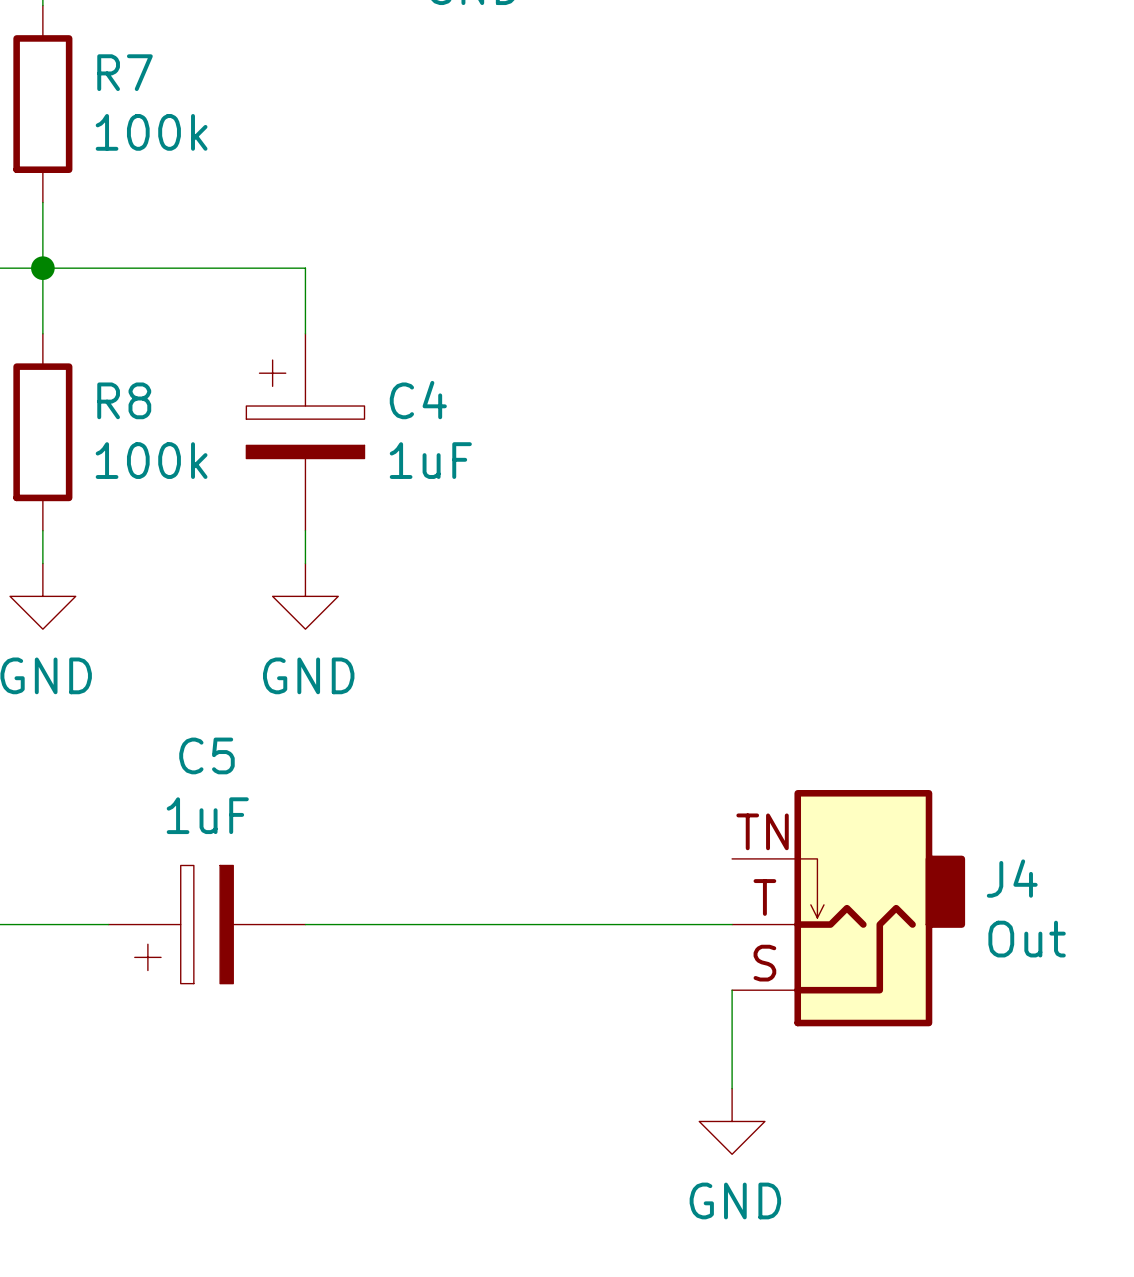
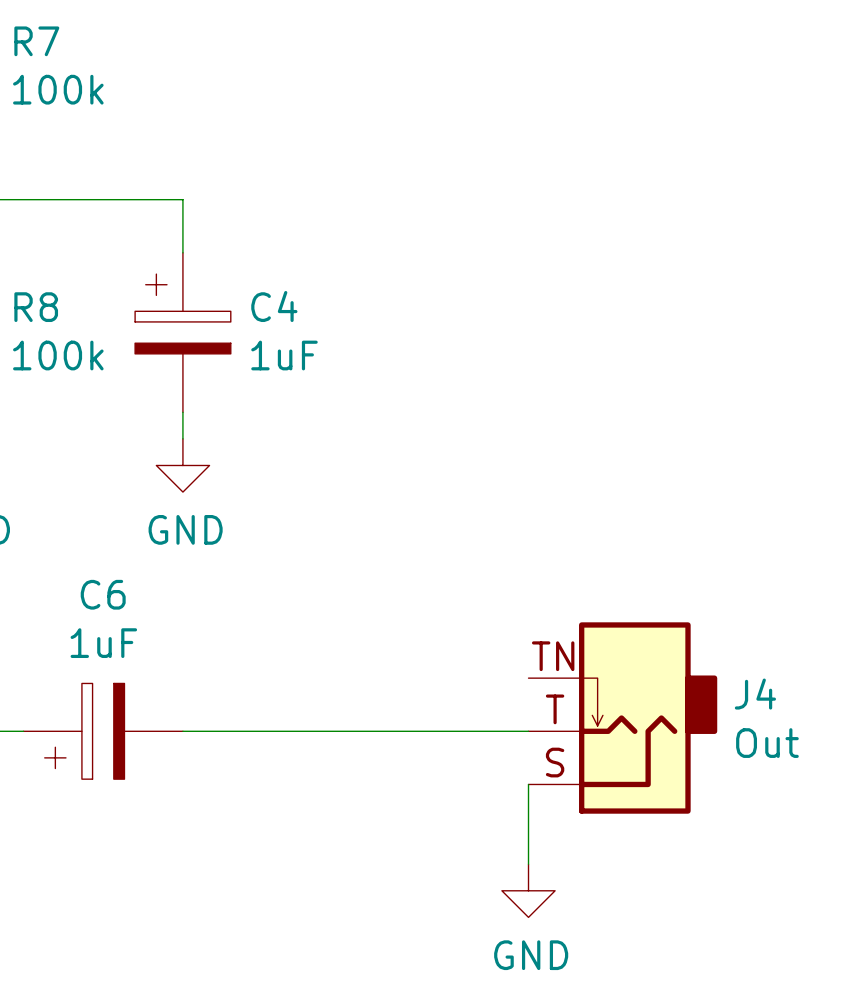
C5 name: C5 (206, 755) -> C6 (103, 594)

